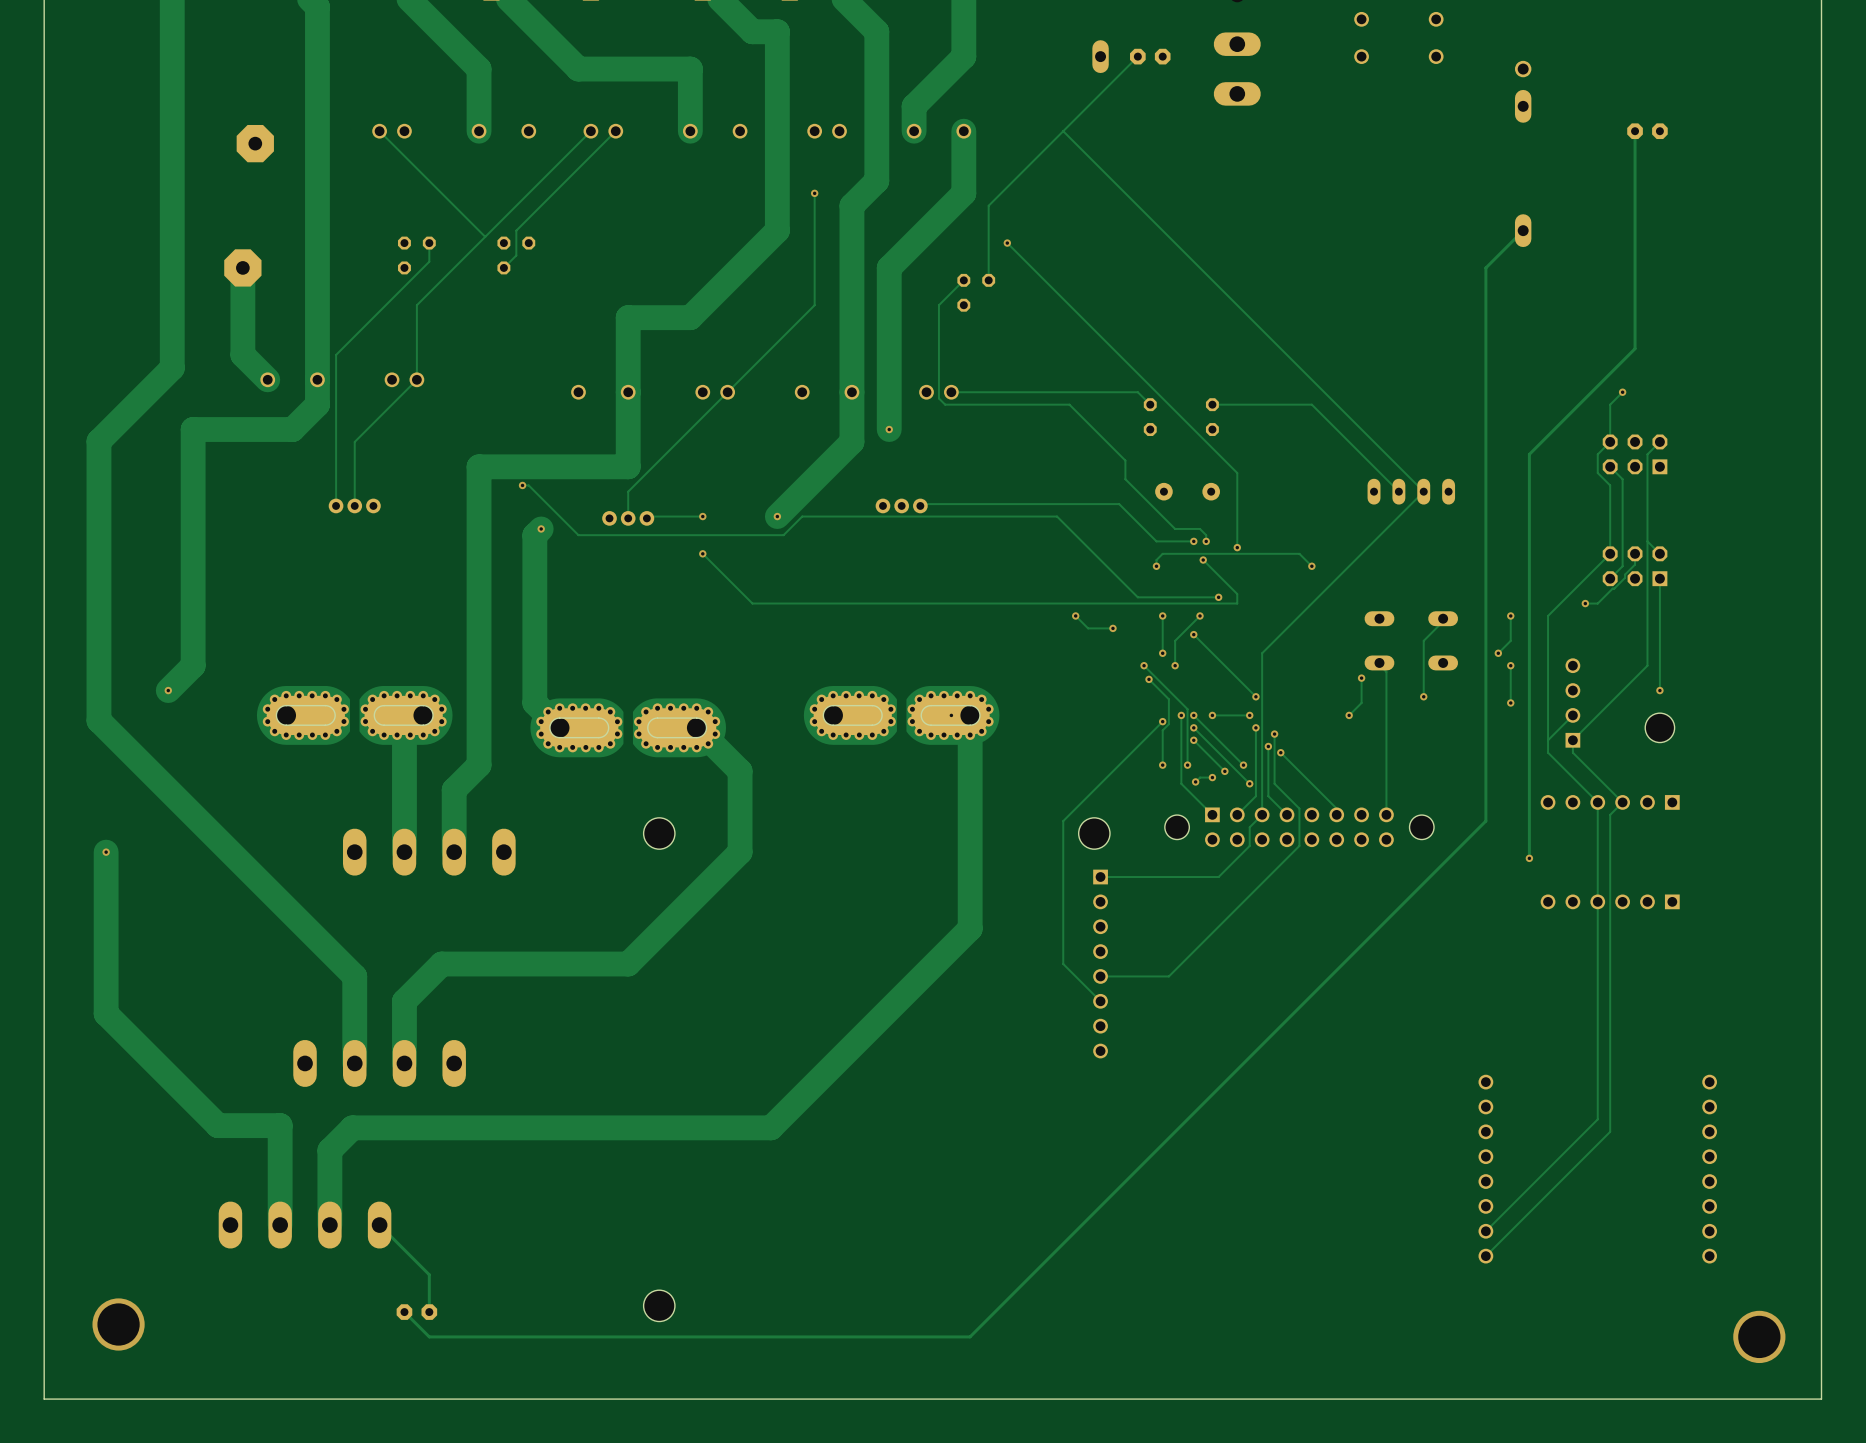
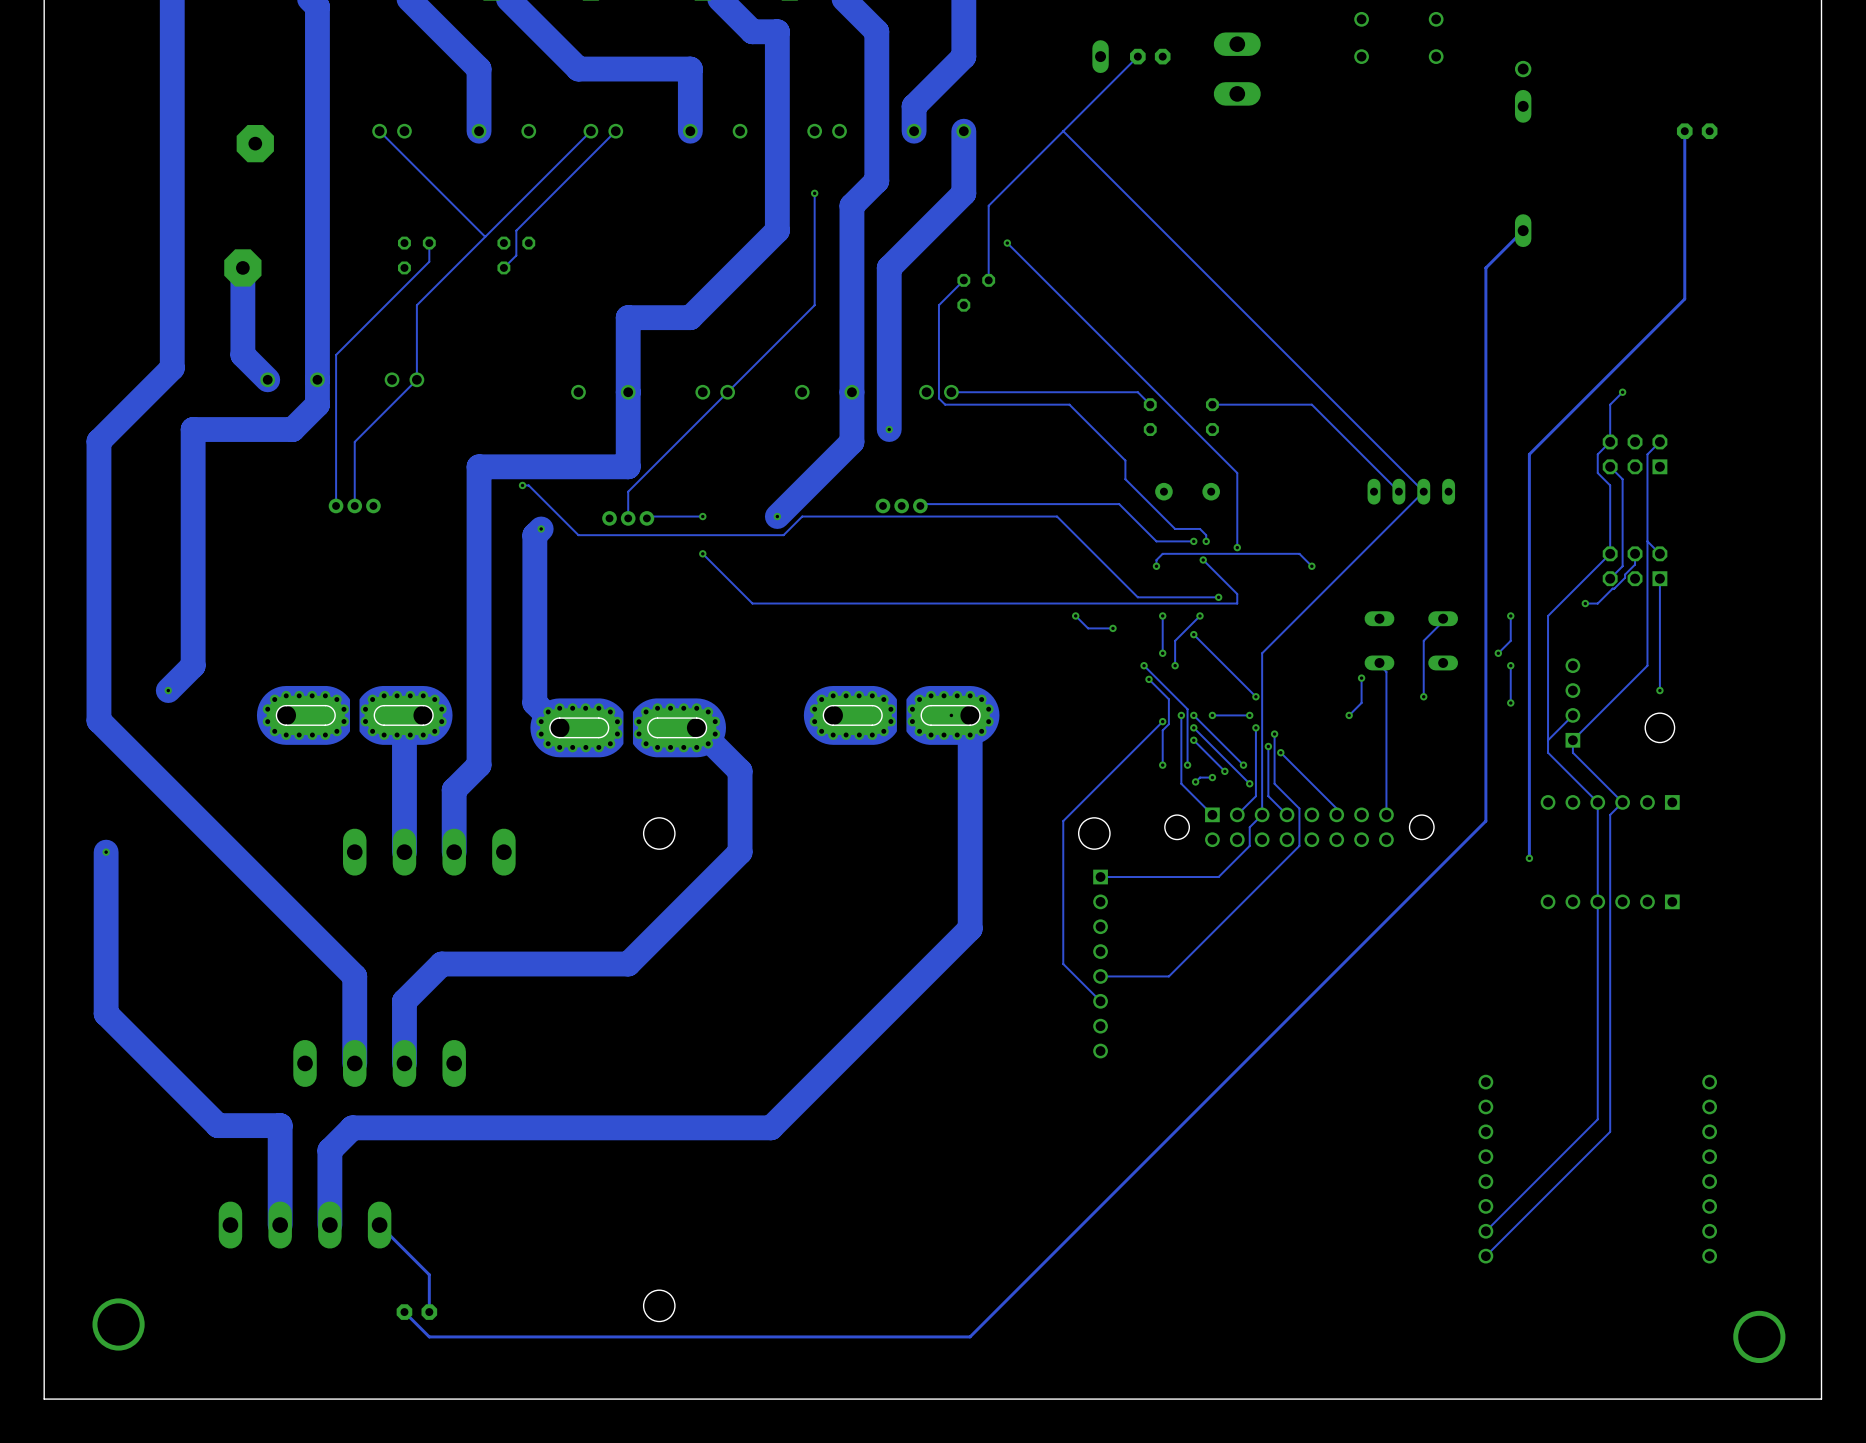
track: (1635, 131) (1635, 348) -> (1684, 131) (1684, 299) (1635, 348)
part position: (1647, 131) -> (1697, 131)

